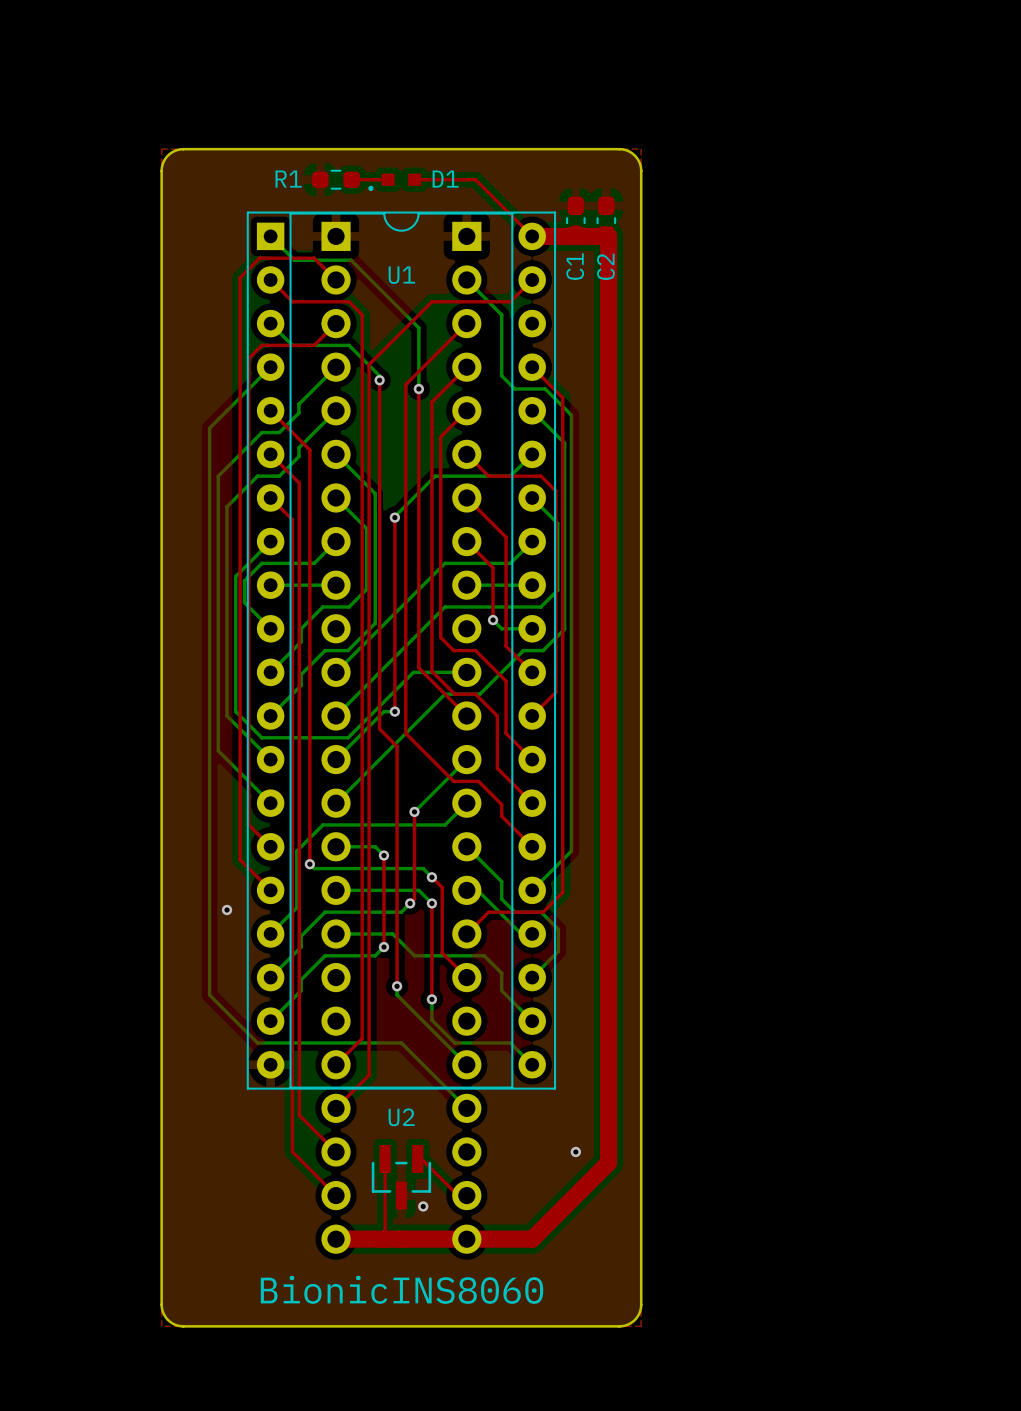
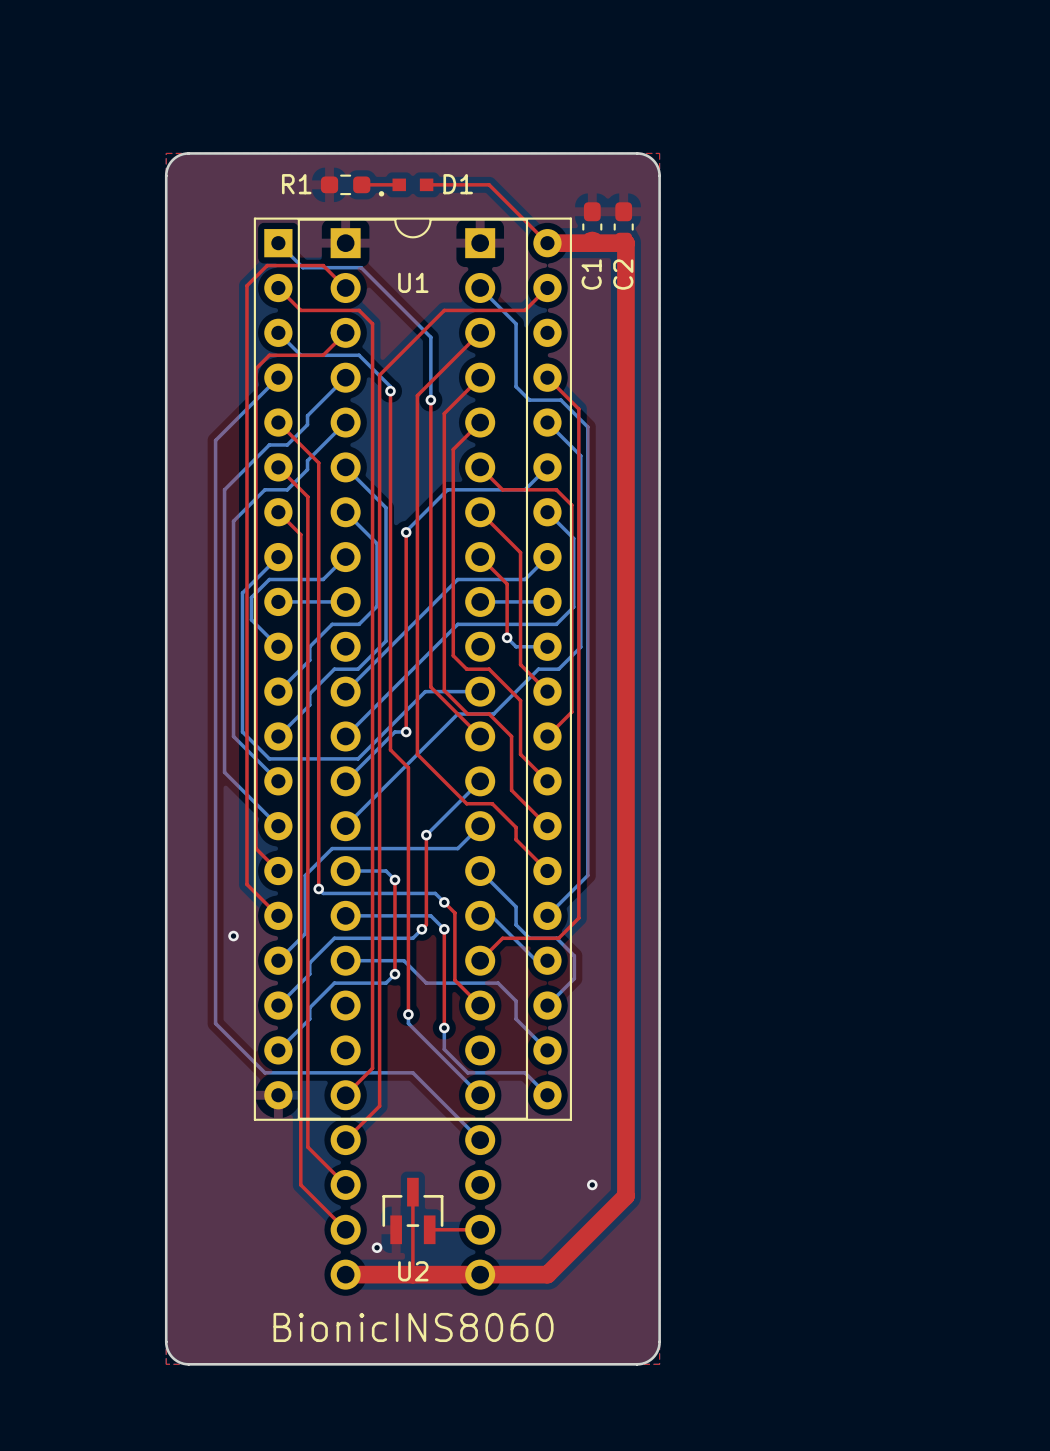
top track: none -> (412, 1188) (412, 1274)
top track: (385, 1158) (383, 1239) -> none
top track: (417, 1158) (421, 1158) (458, 1195) -> (429, 1226) (433, 1229) (471, 1229)
U2 rotation: 0° (401, 1177) -> 180° (412, 1210)
via position: (423, 1206) -> (377, 1247)

